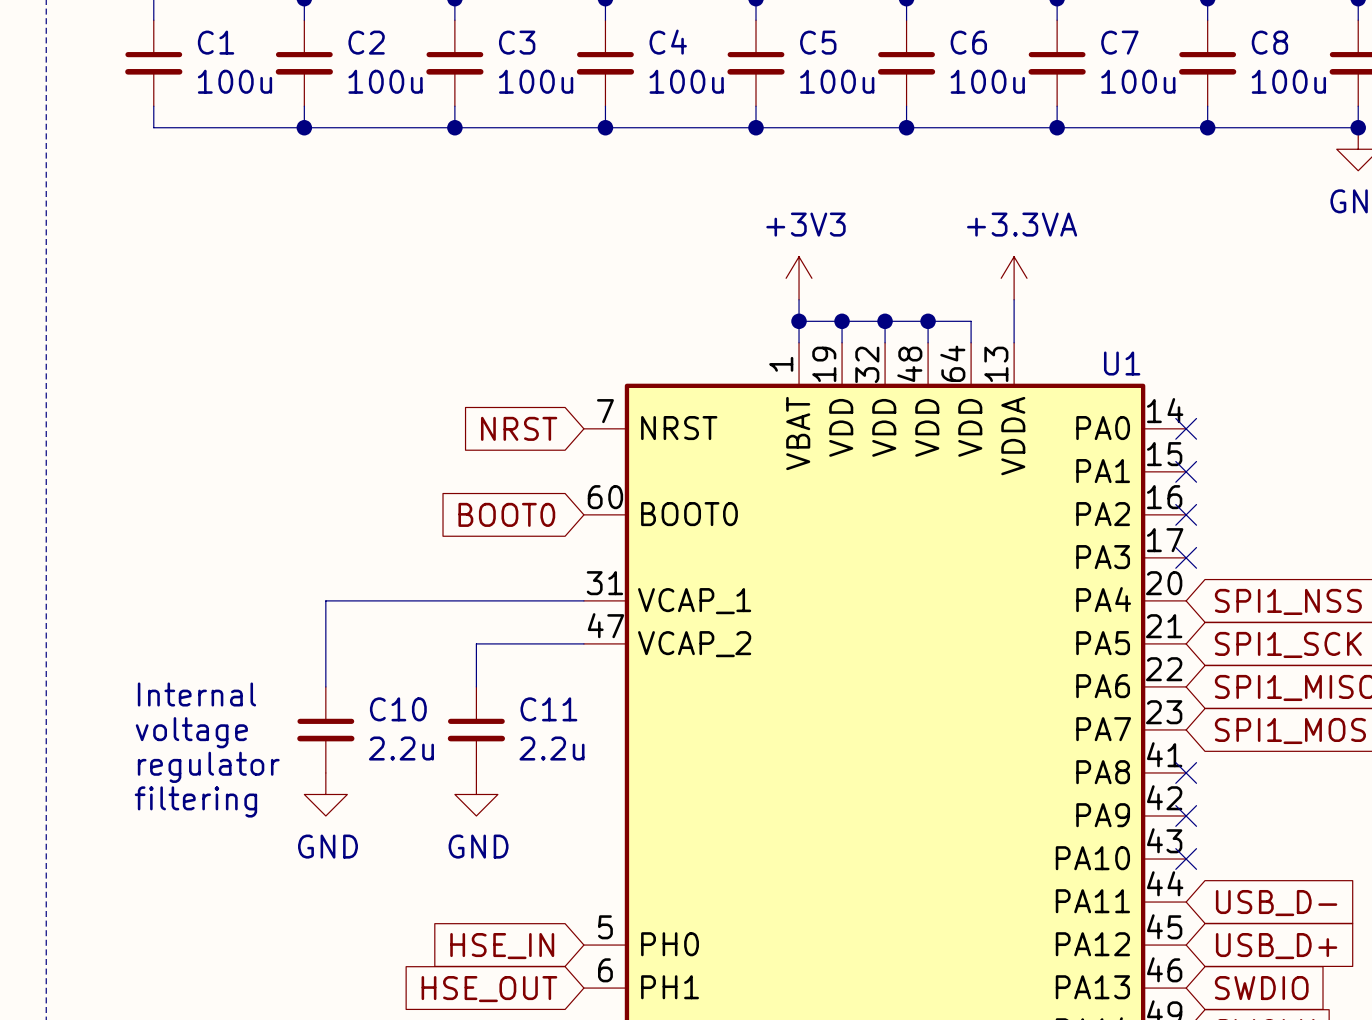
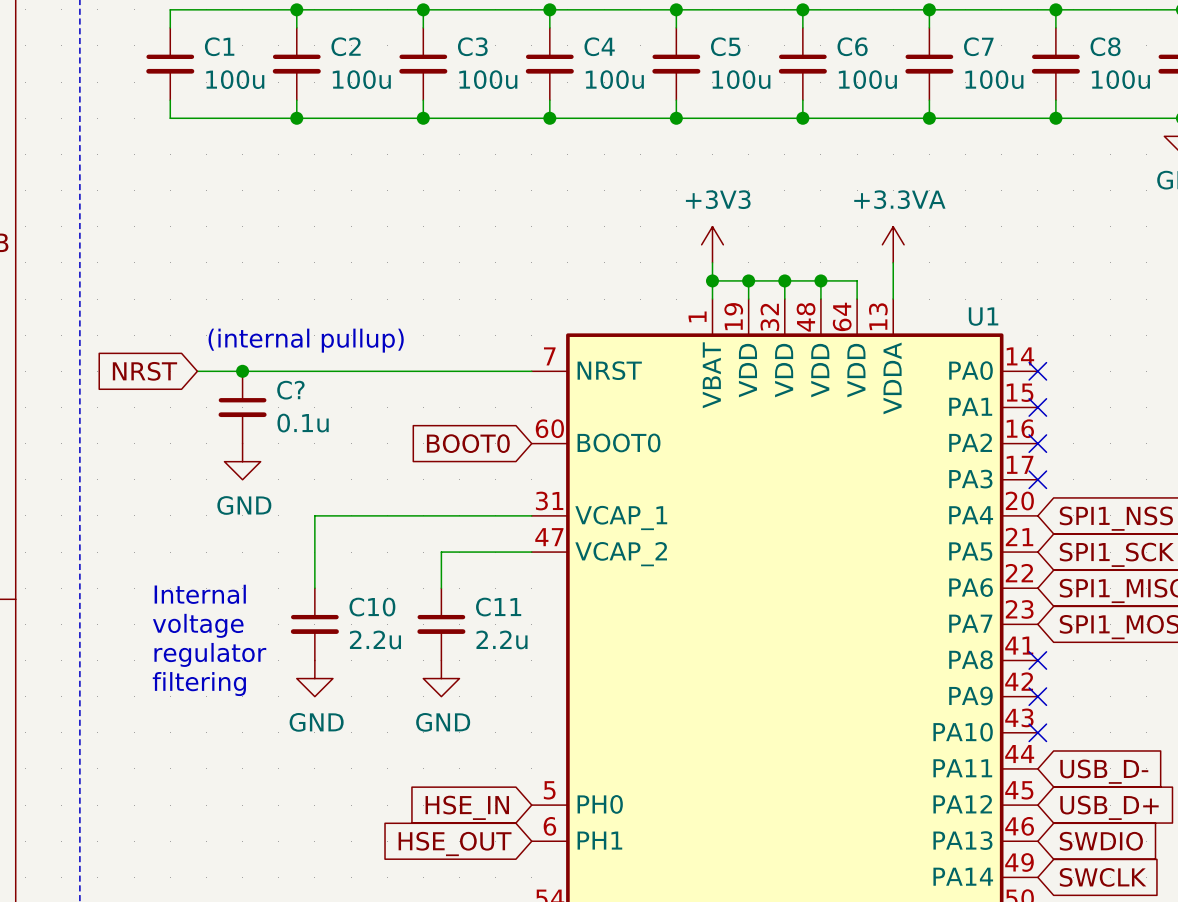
text: none -> (internal pullup) (306, 340)
wire: none -> (197, 371) (531, 371)
junction: none -> (242, 371)
global label position: NRST (519, 428) -> NRST (144, 371)
C?: none -> 0.1u (242, 407)
power symbol: none -> GND (242, 461)

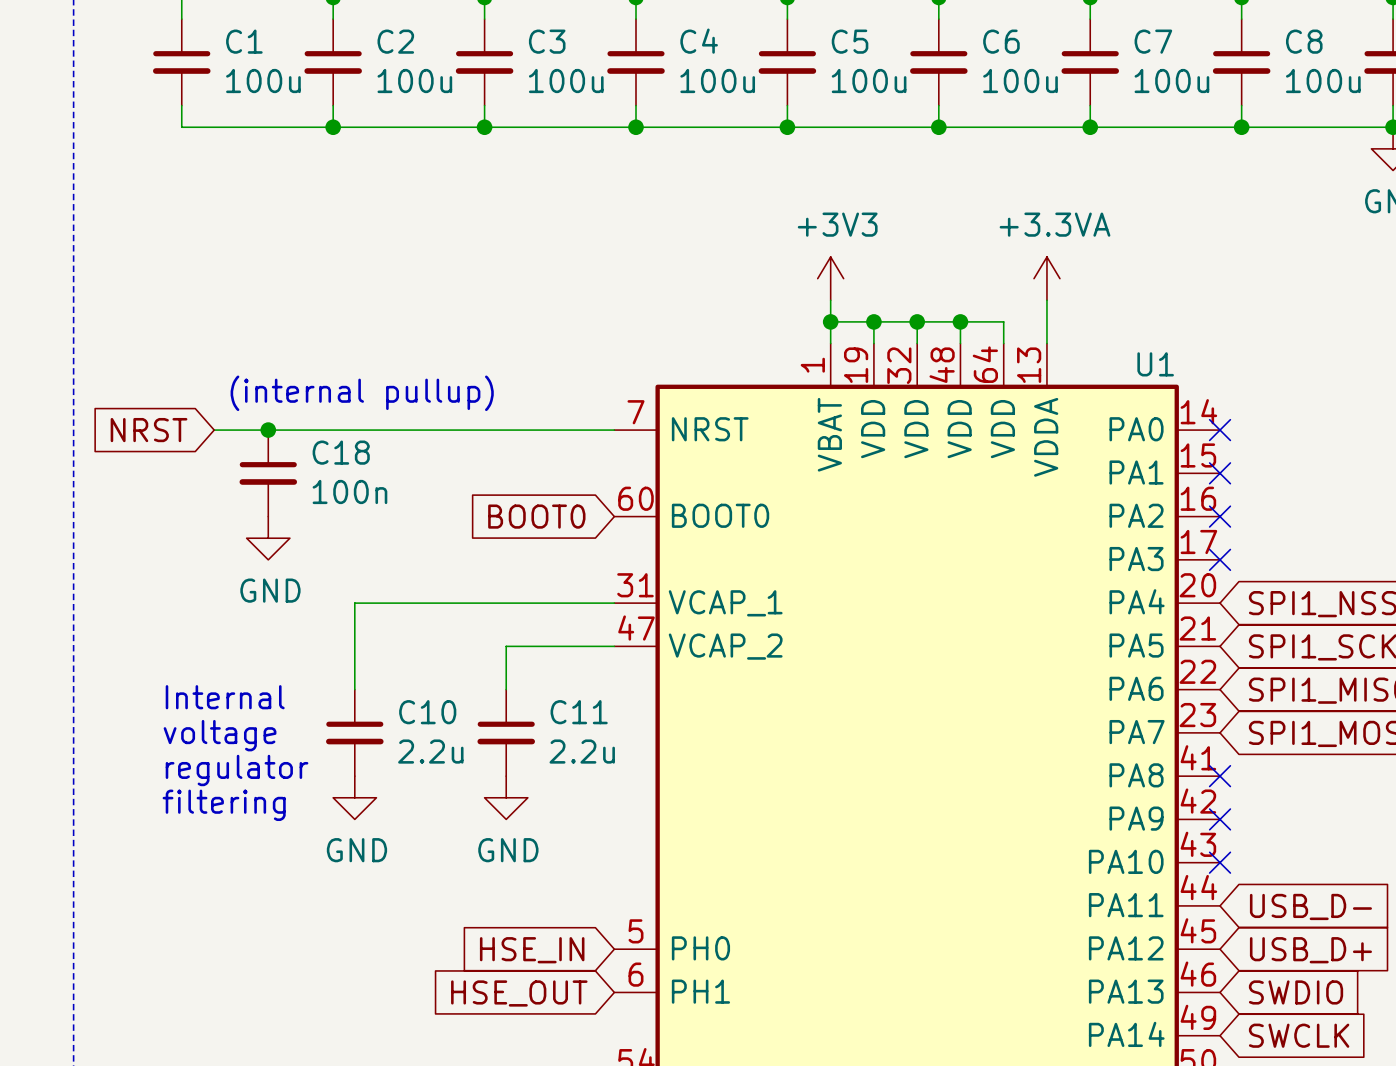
C? name: C? (290, 390) -> C18 (341, 452)
C? value: 0.1u (303, 423) -> 100n (349, 491)

